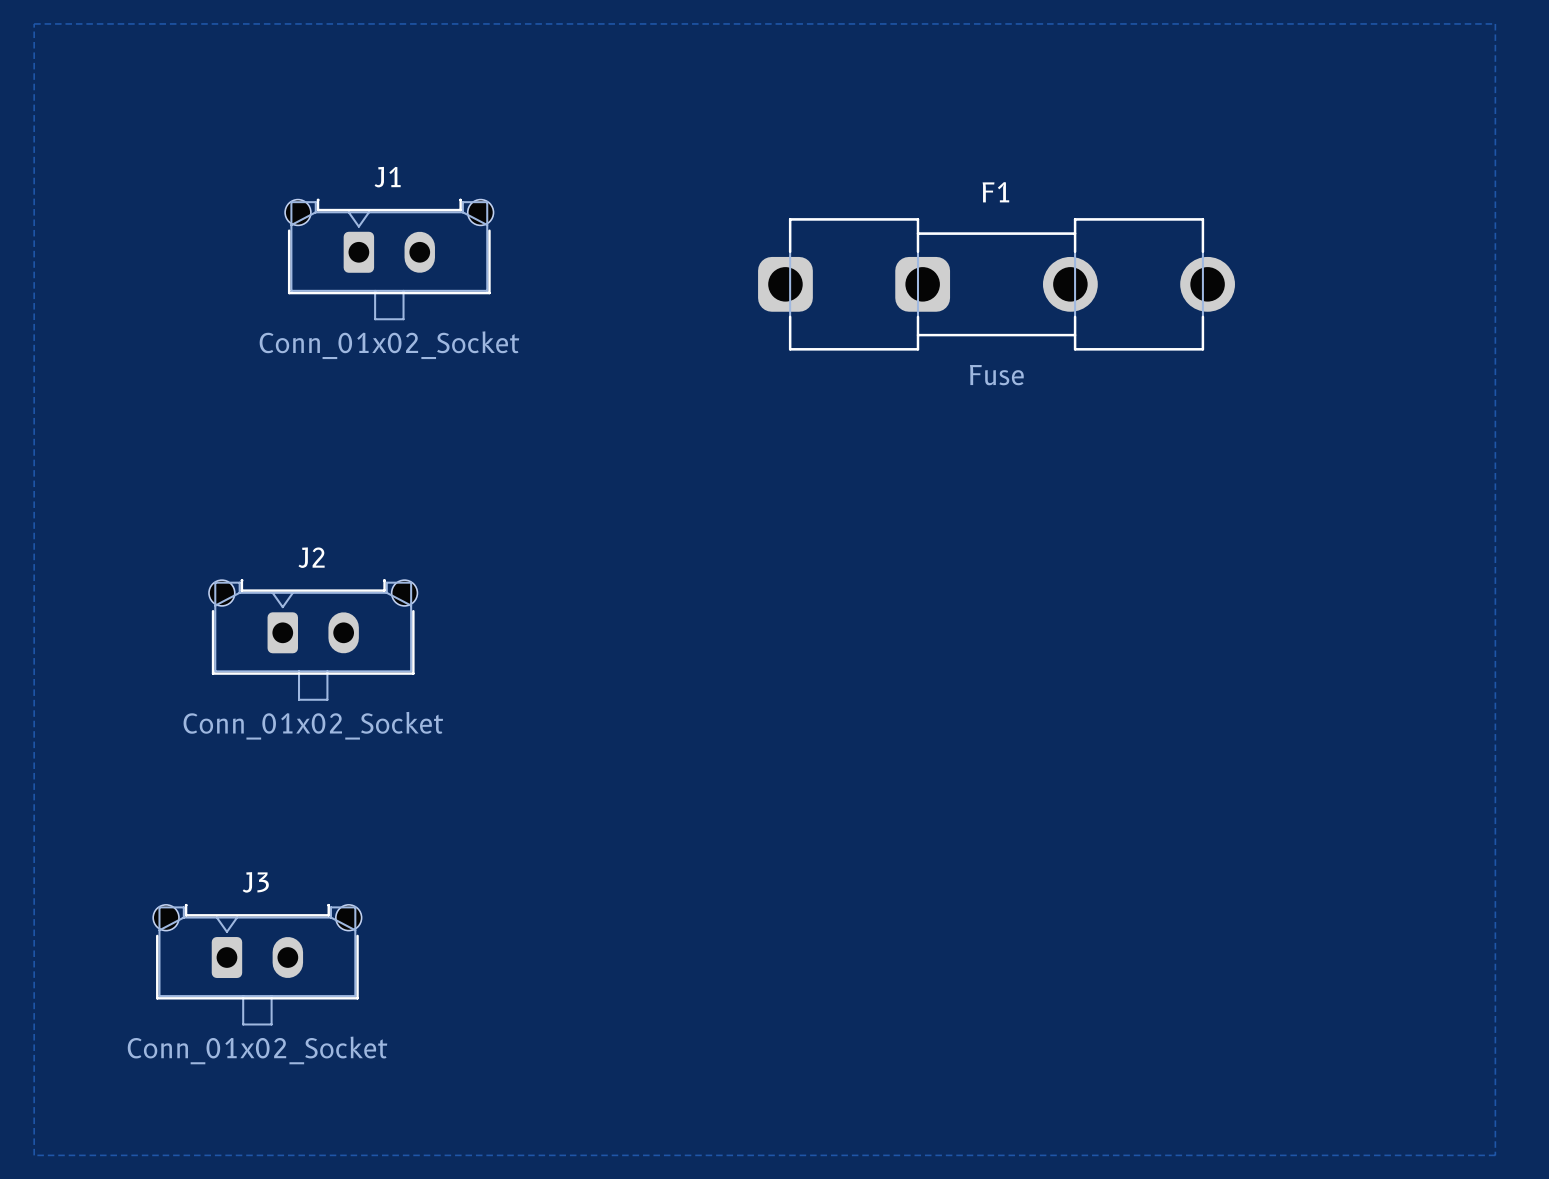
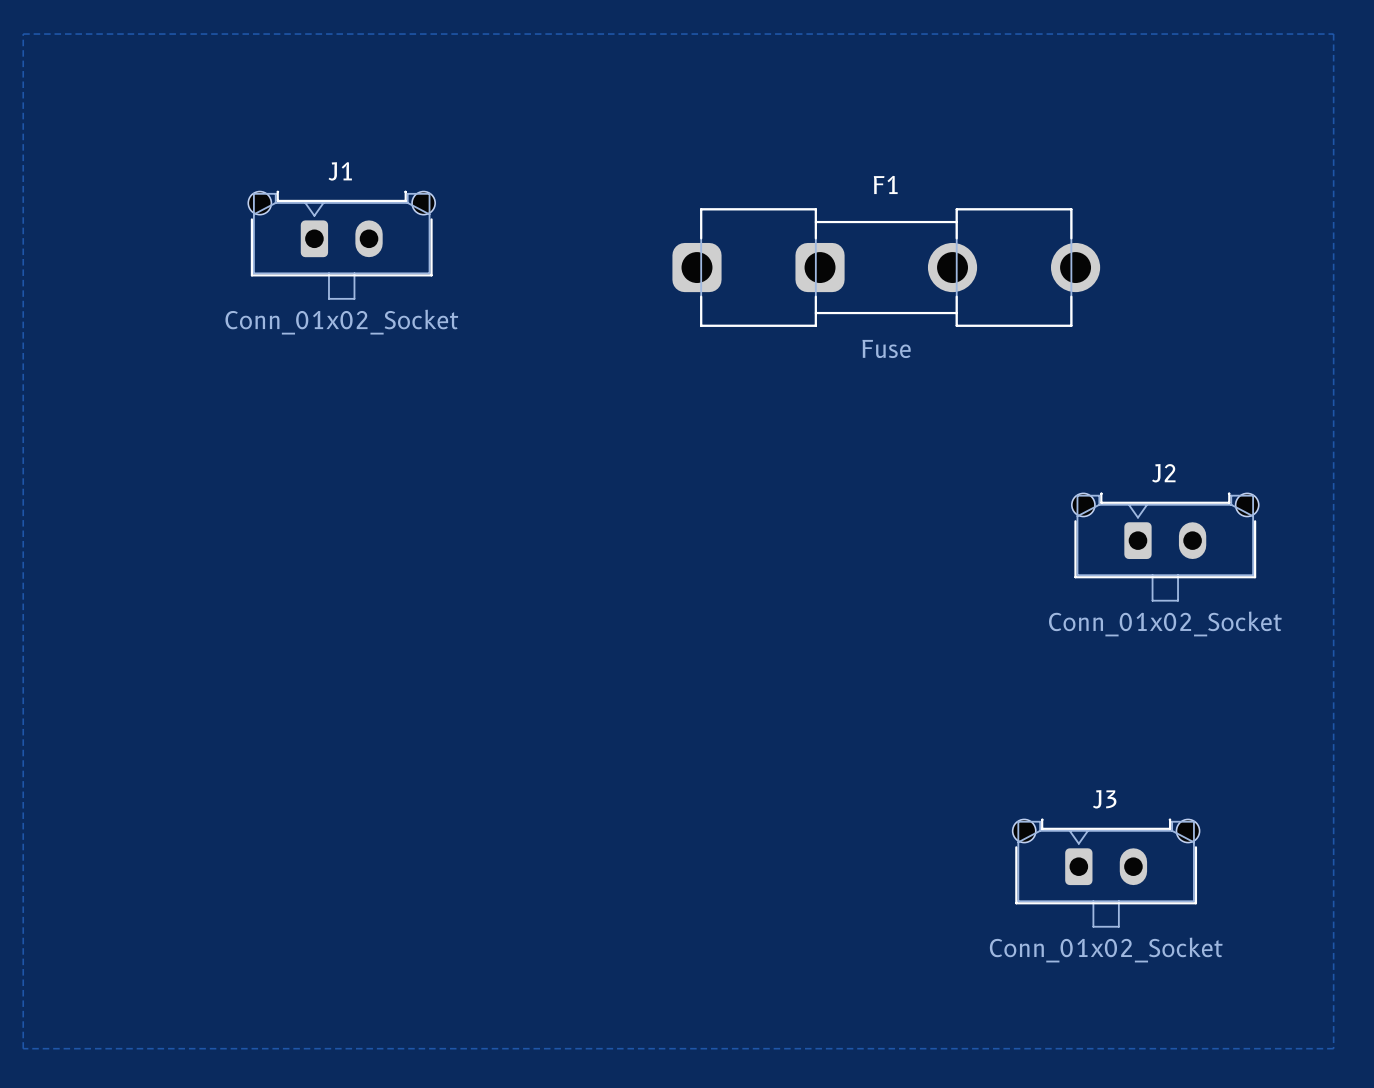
J2 position: (313, 640) -> (1165, 547)
J3 position: (257, 964) -> (1106, 873)

